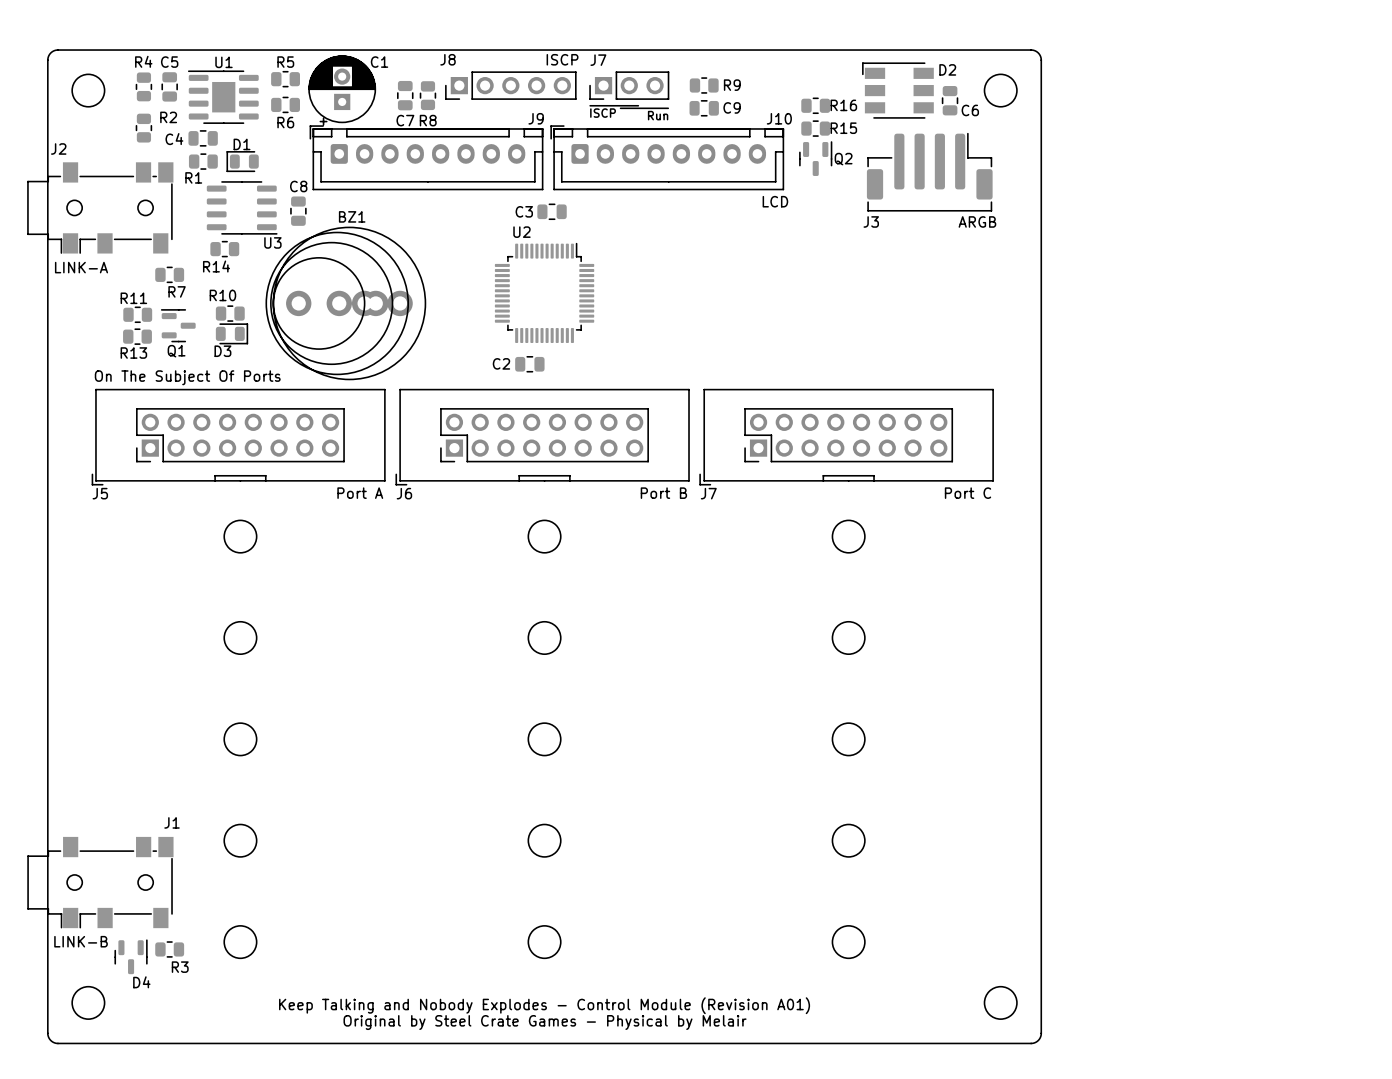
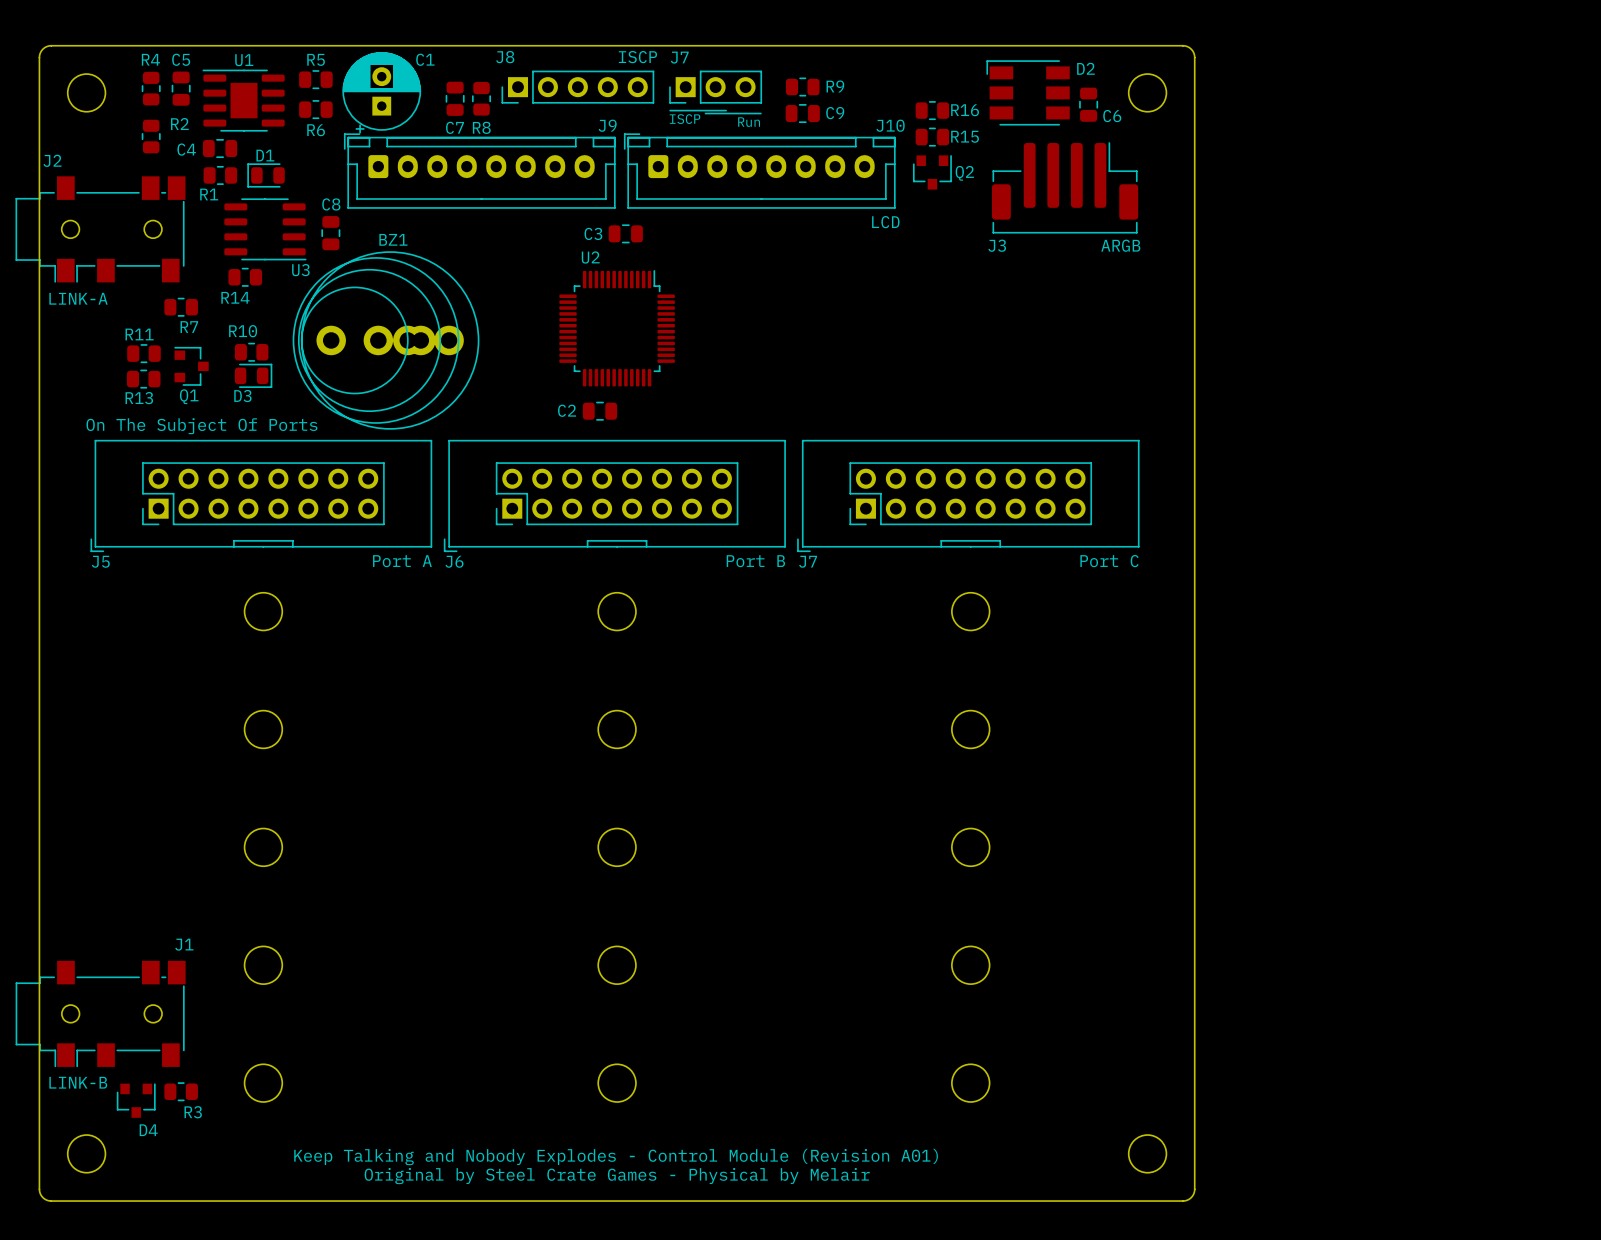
Q2 footprint: [799, 141, 833, 176] -> [913, 155, 952, 190]
Q1 footprint: [161, 309, 196, 343] -> [174, 347, 209, 386]
D4 footprint: [114, 939, 148, 975] -> [116, 1083, 156, 1118]

